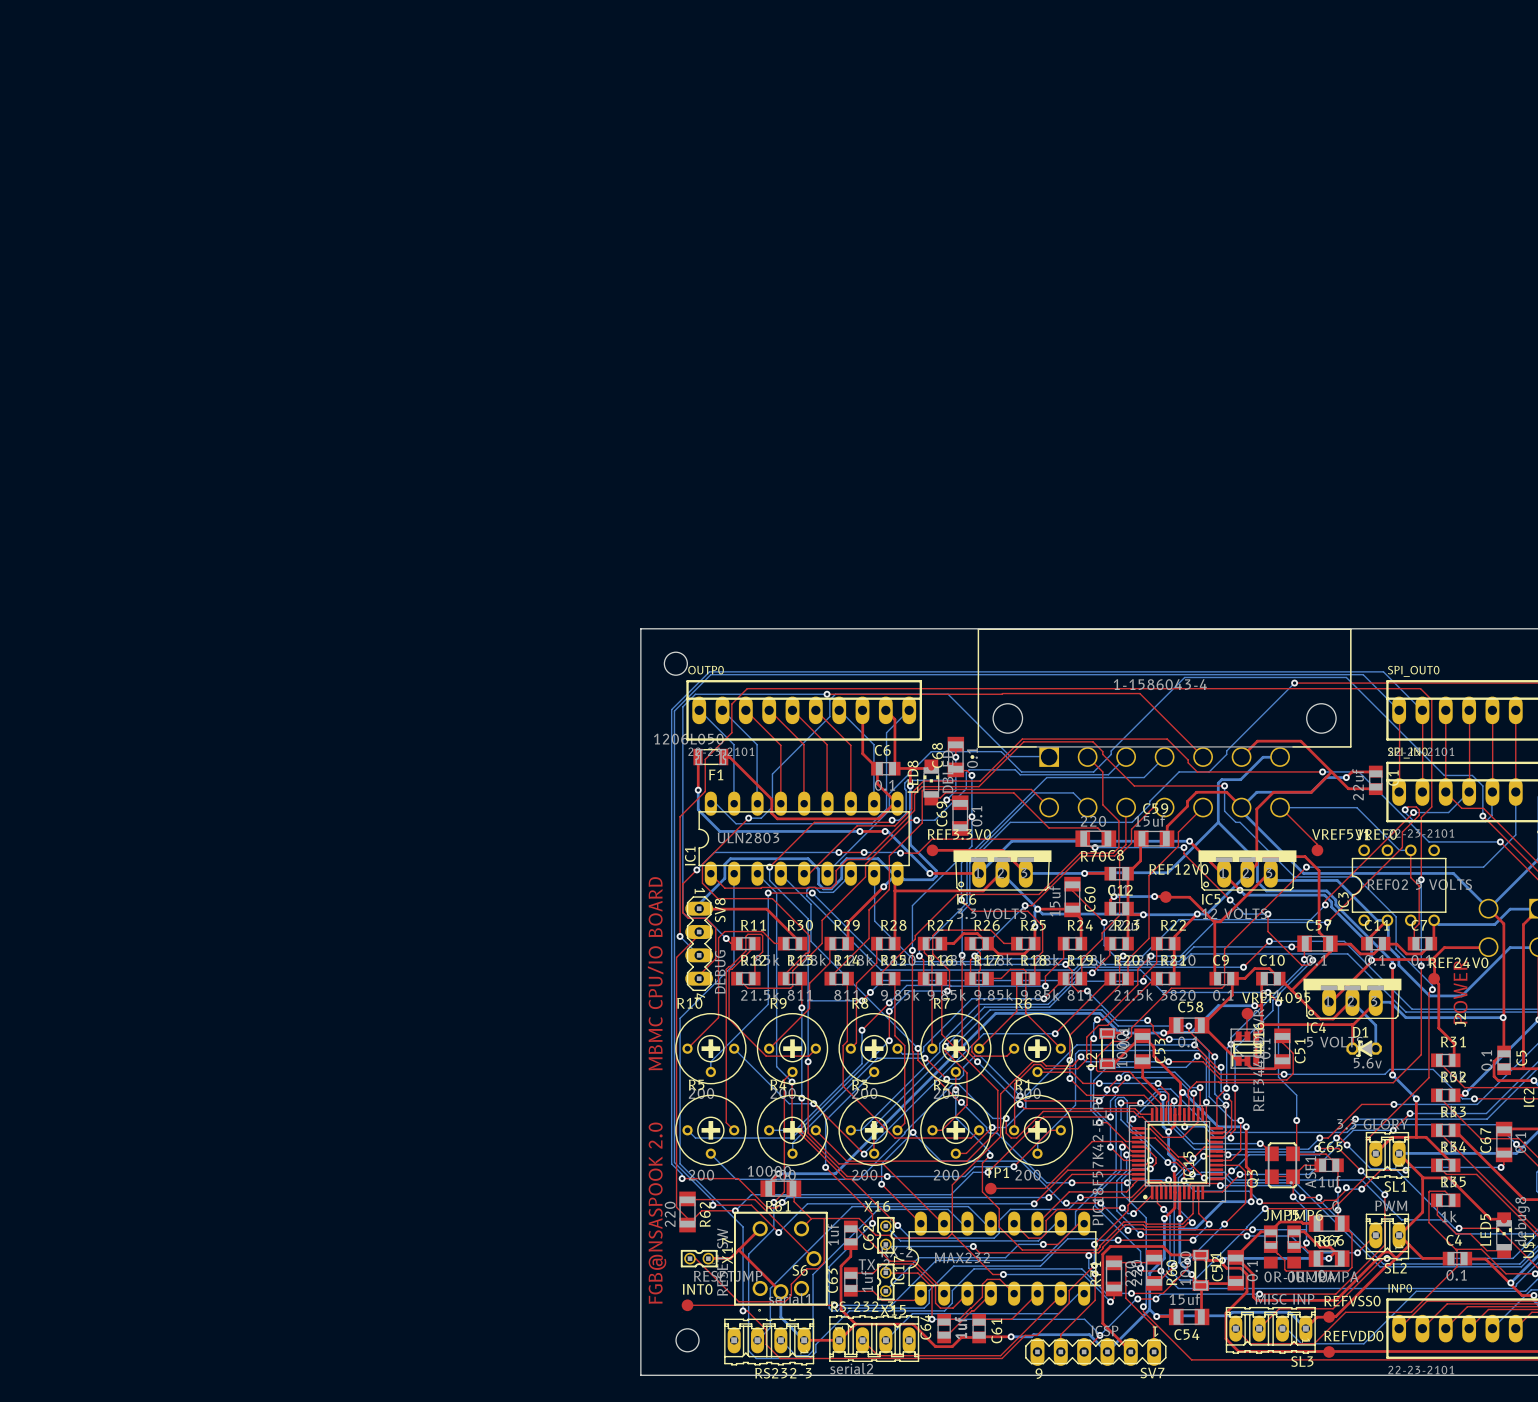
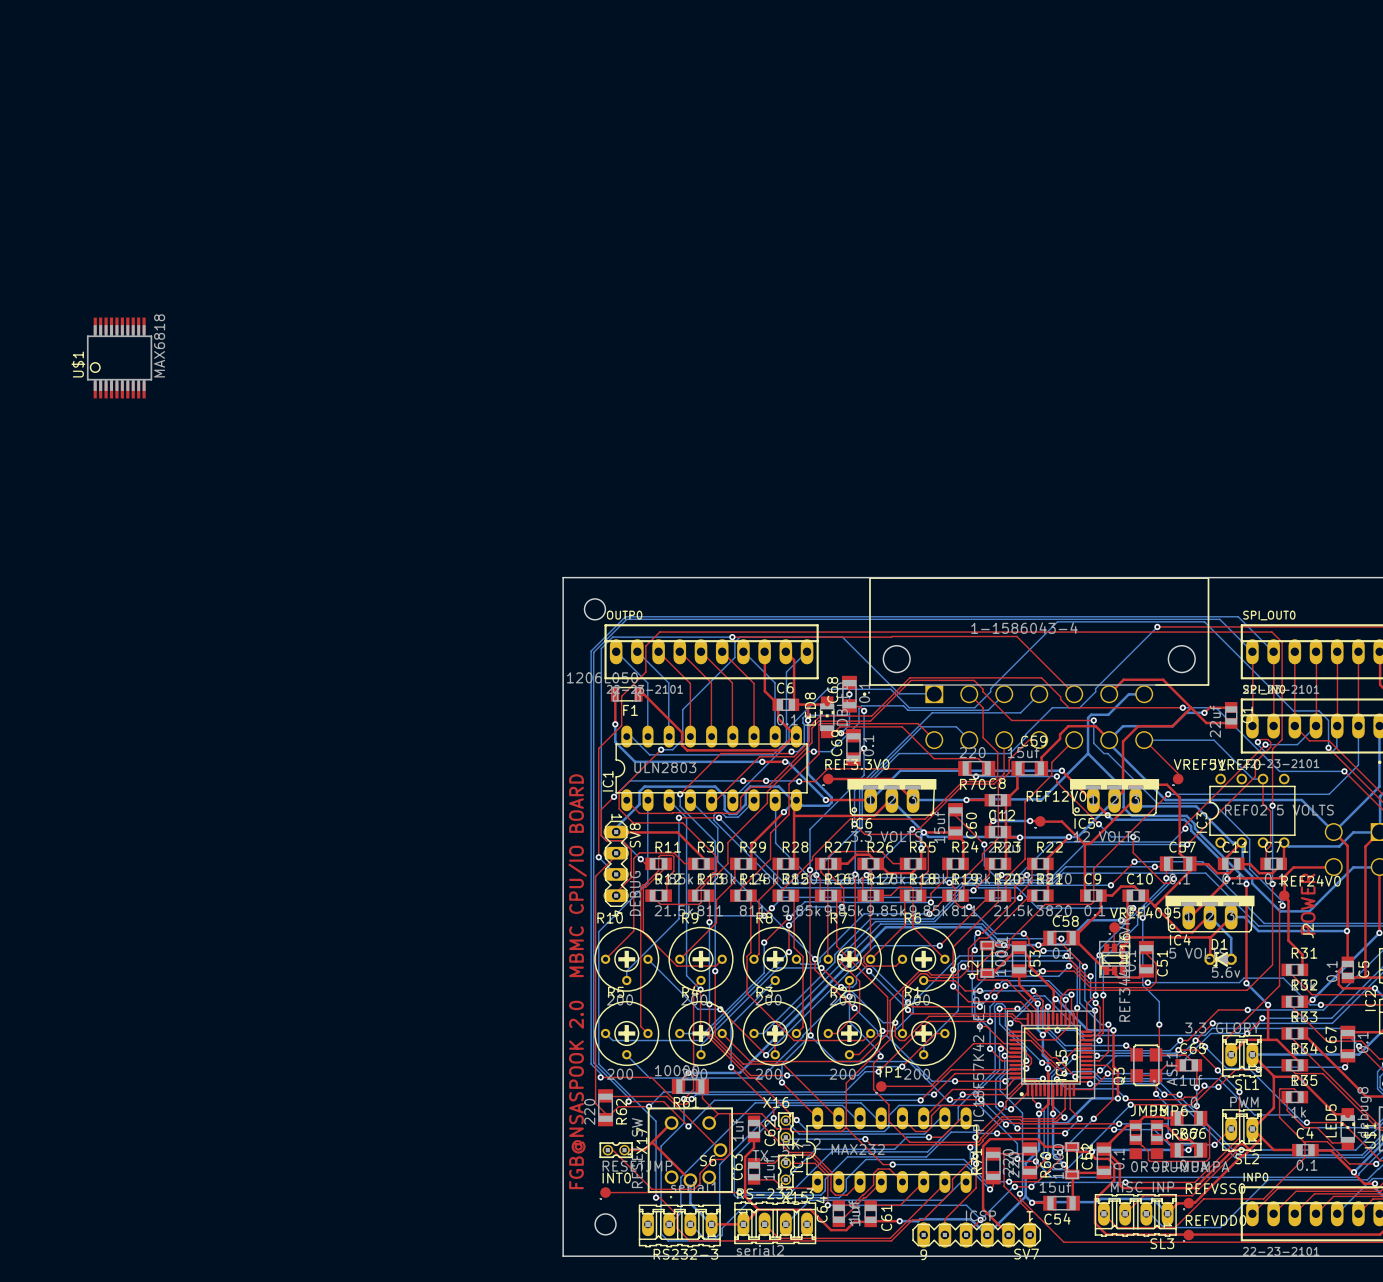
U$1: none -> MAX6818 (119, 357)

